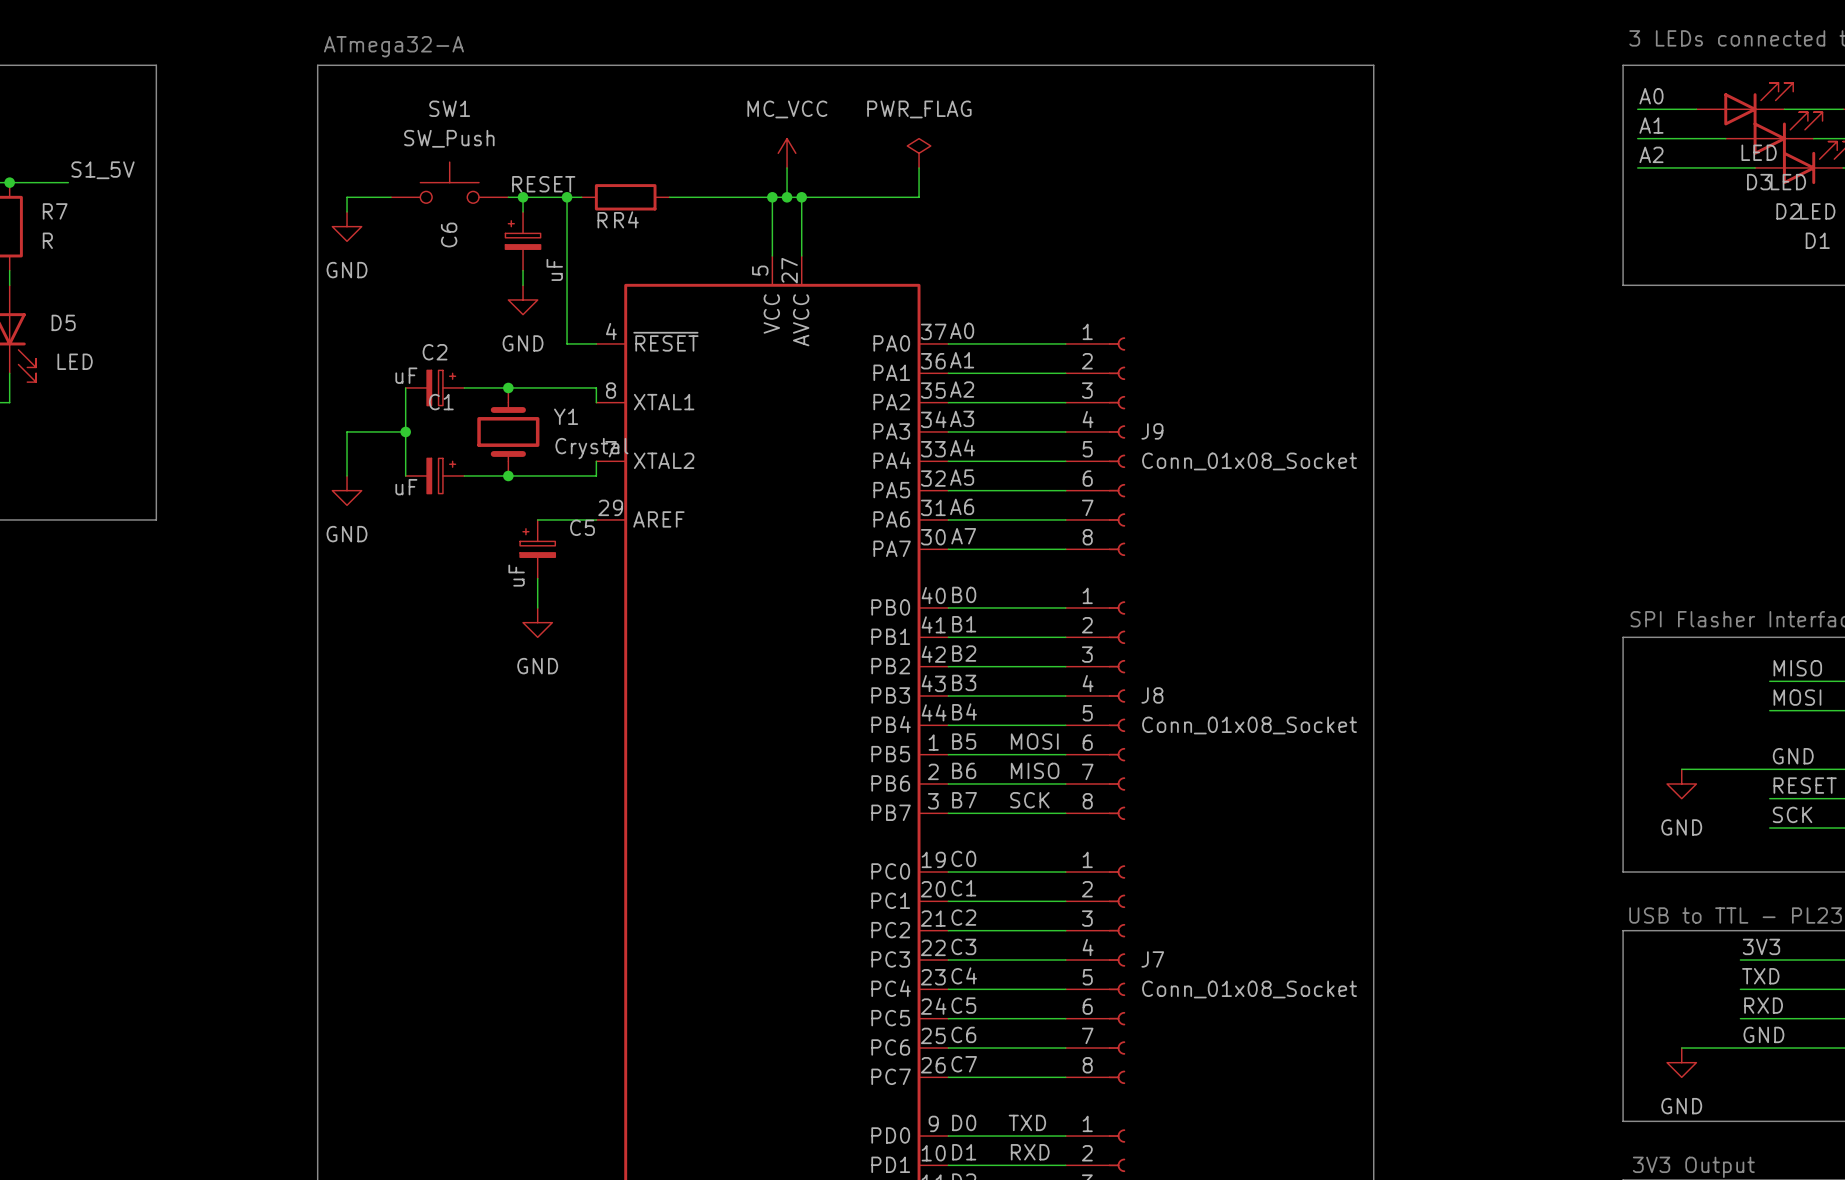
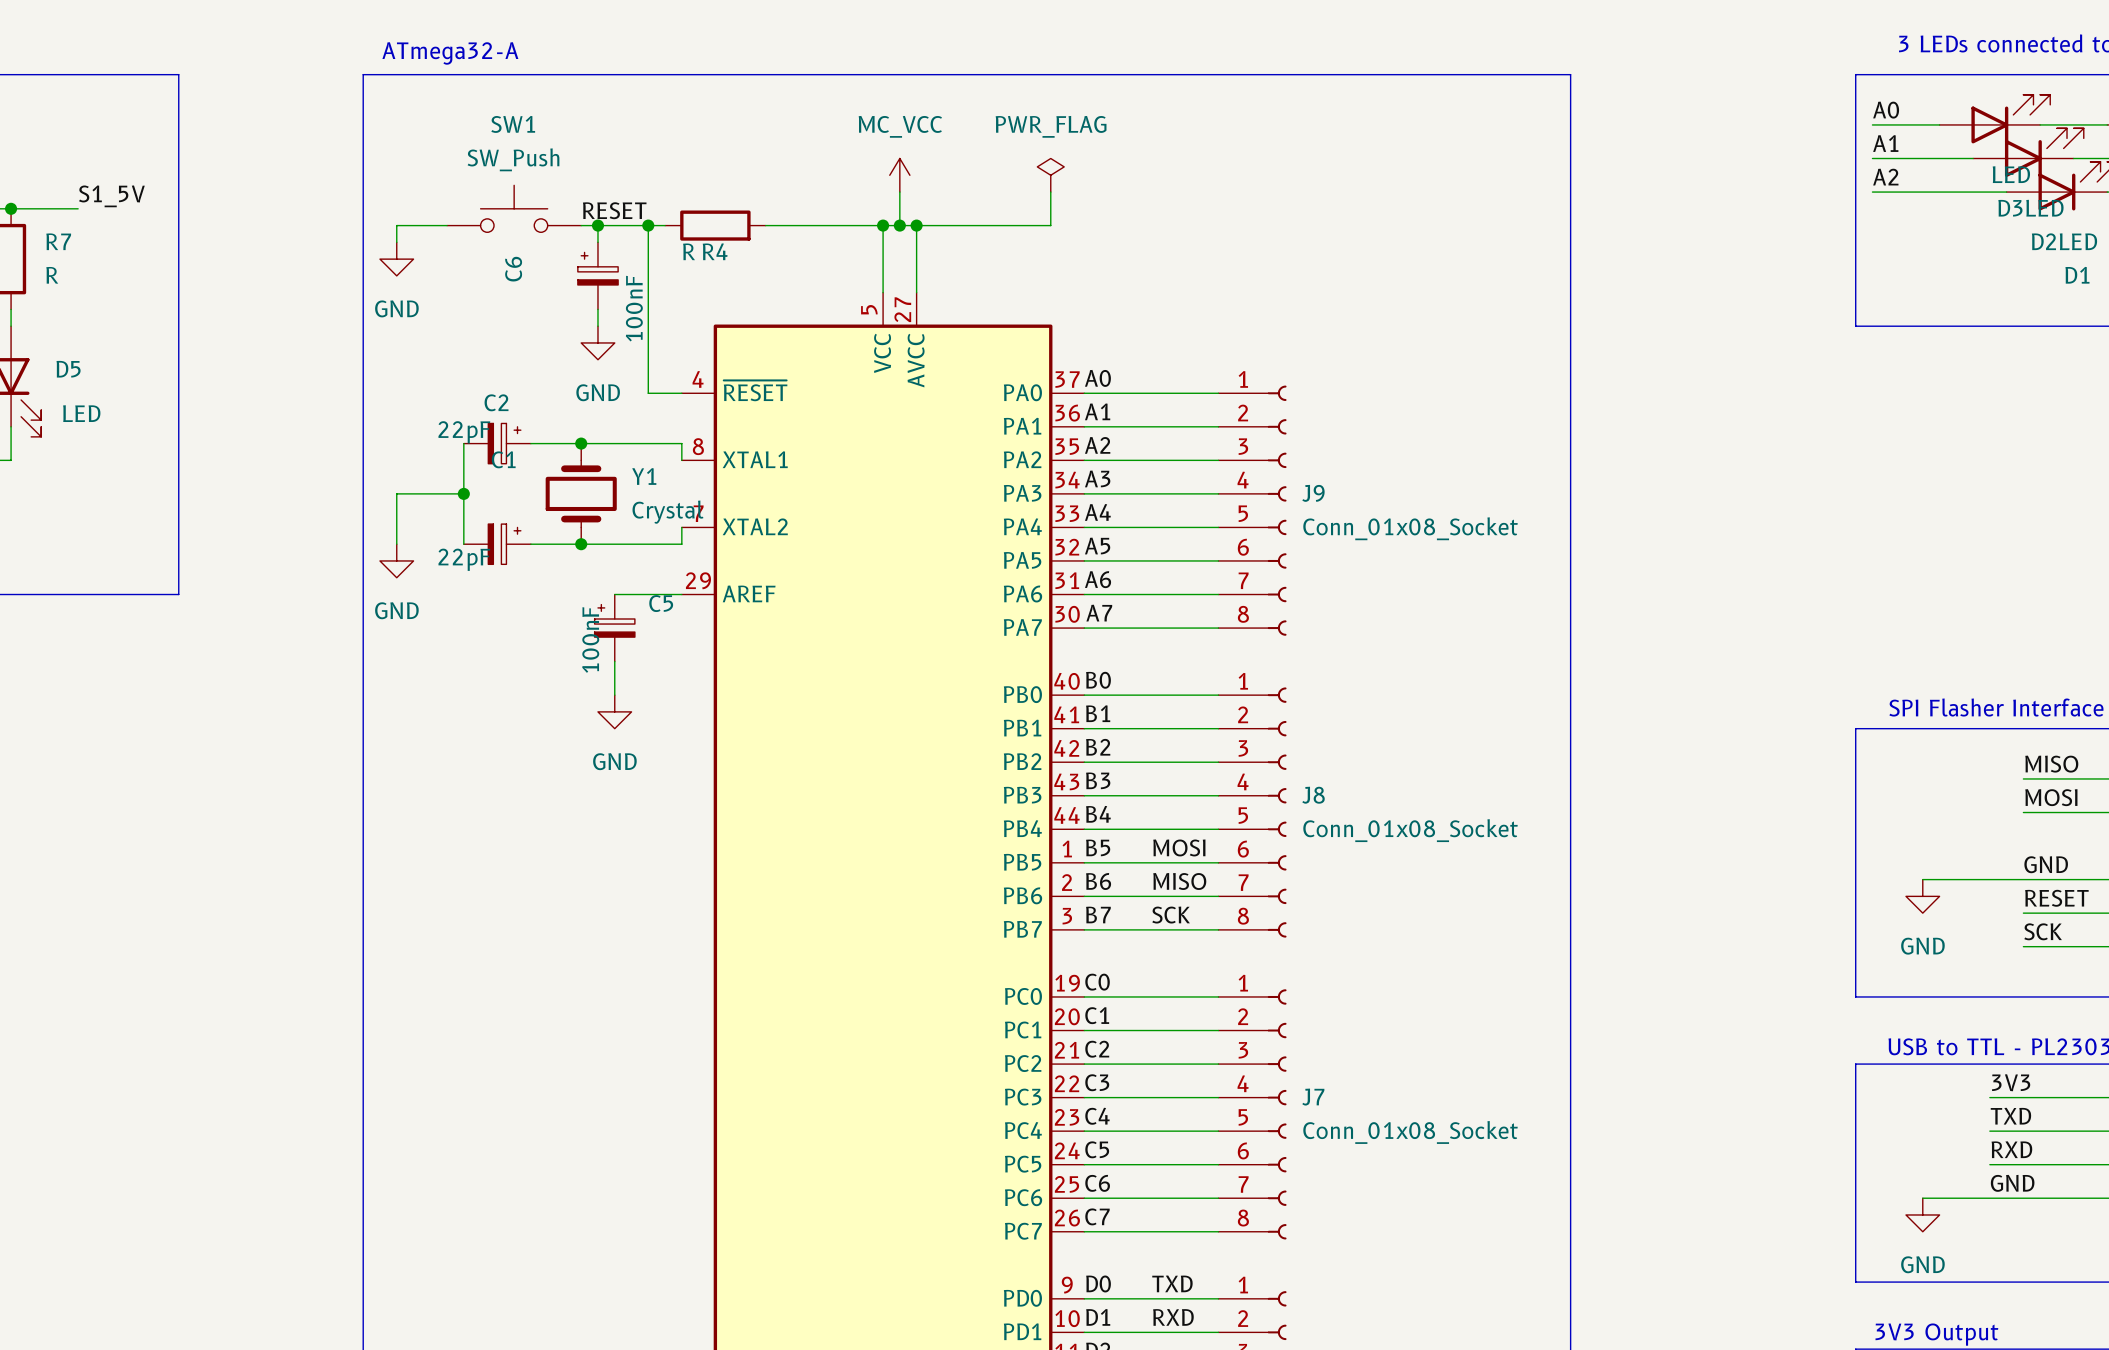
C6 value: uF (554, 269) -> 100nF (634, 308)
C2 value: uF (406, 375) -> 22pF (464, 432)
C1 value: uF (406, 487) -> 22pF (464, 559)
C5 value: uF (516, 575) -> 100nF (590, 640)

